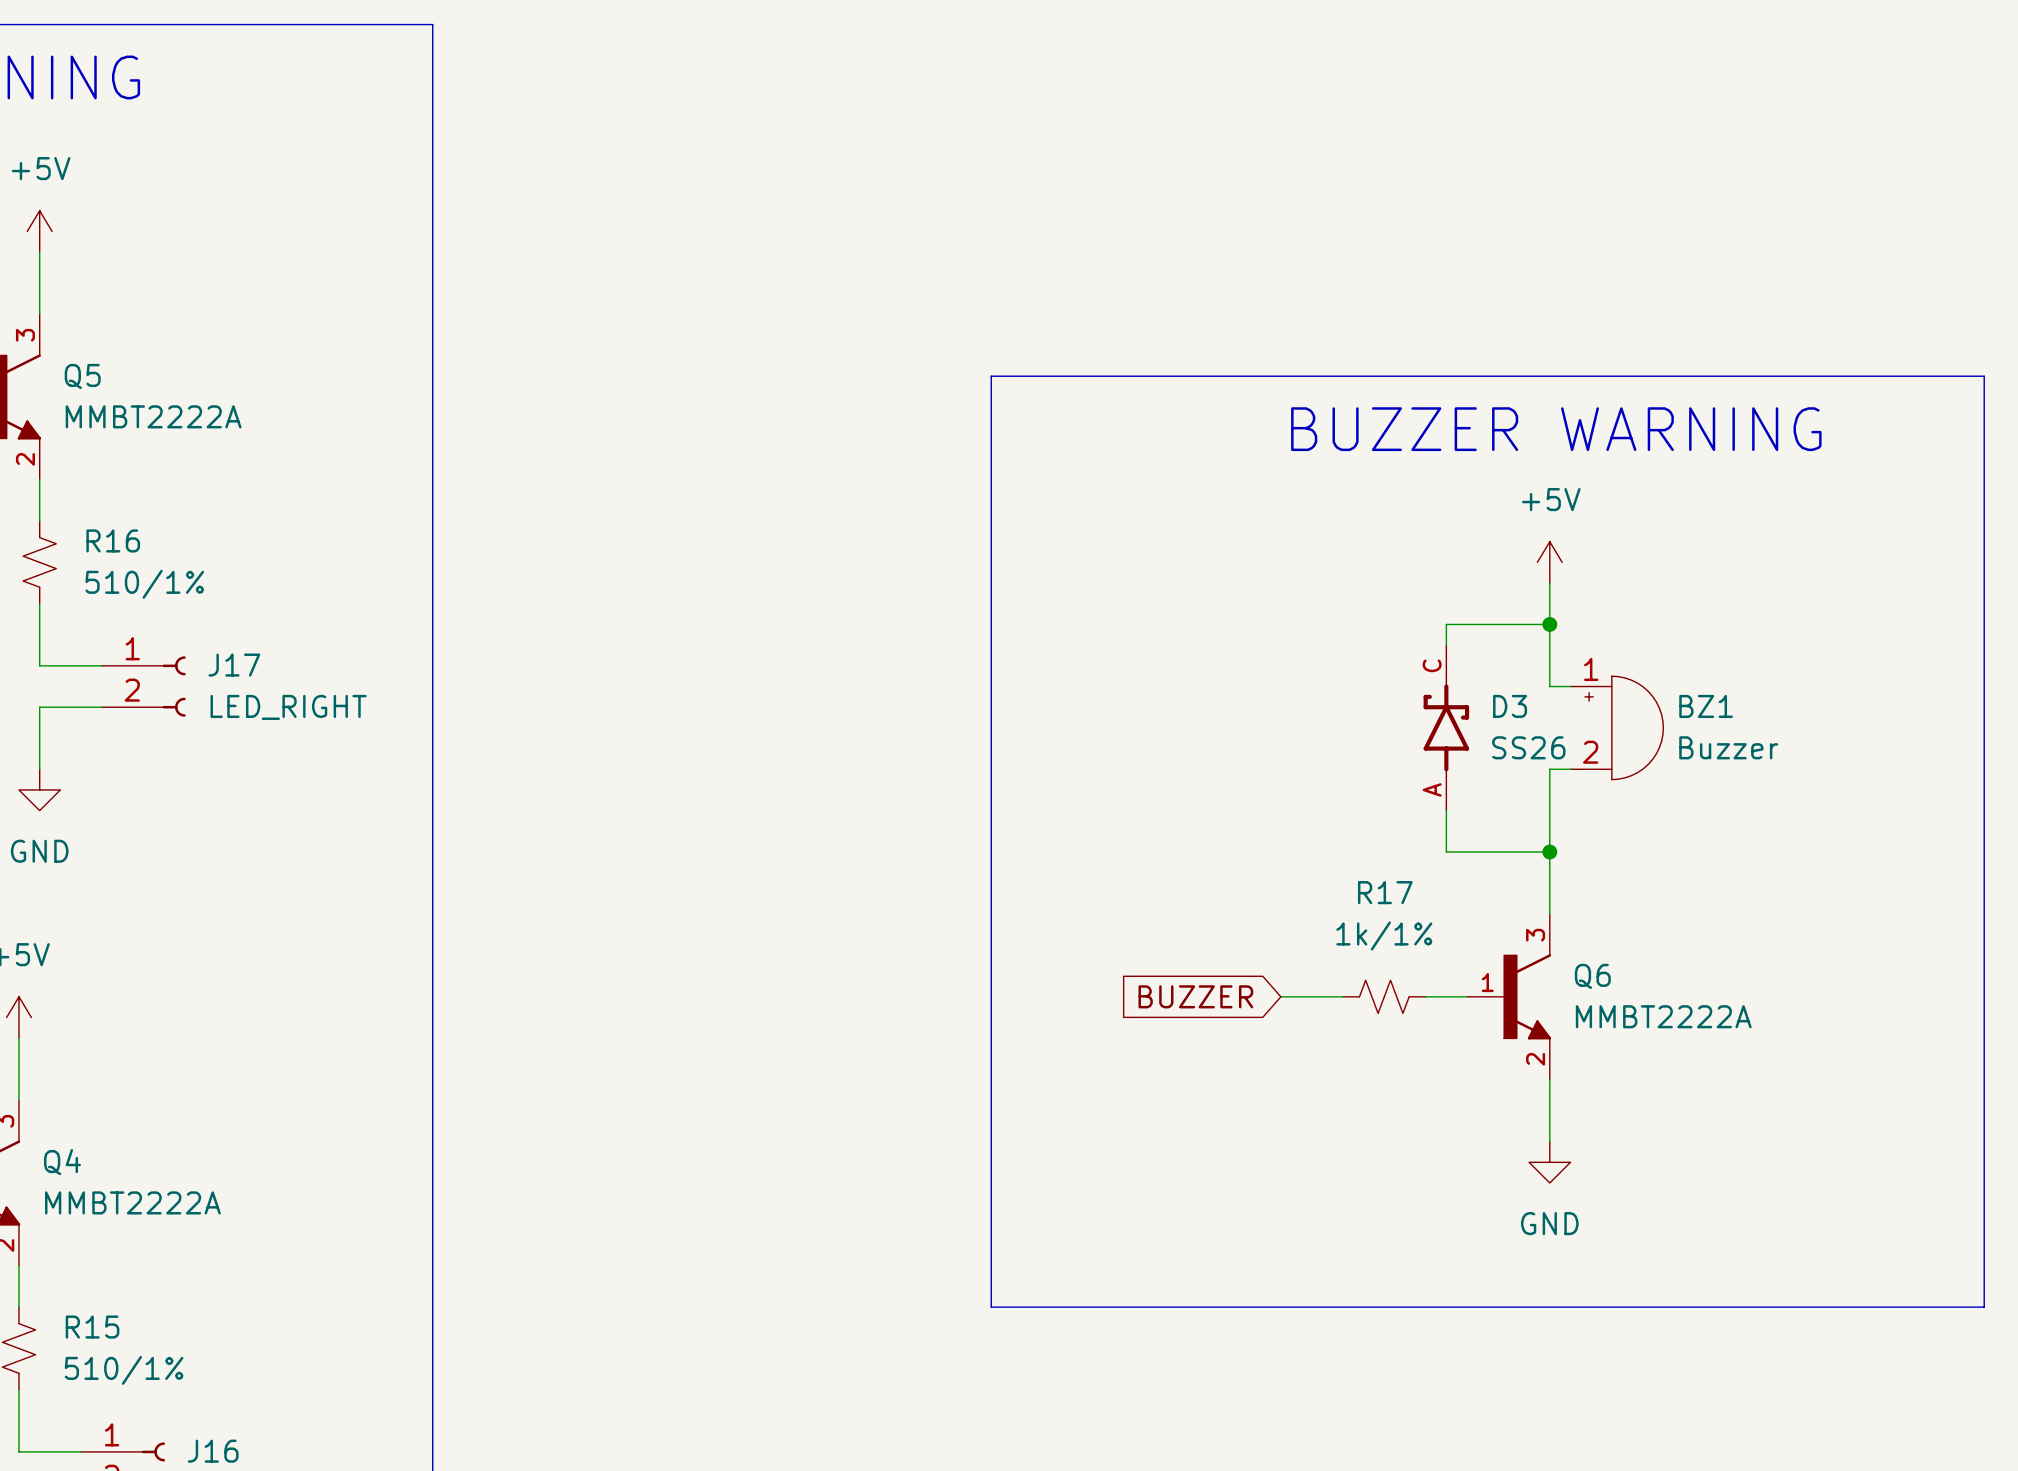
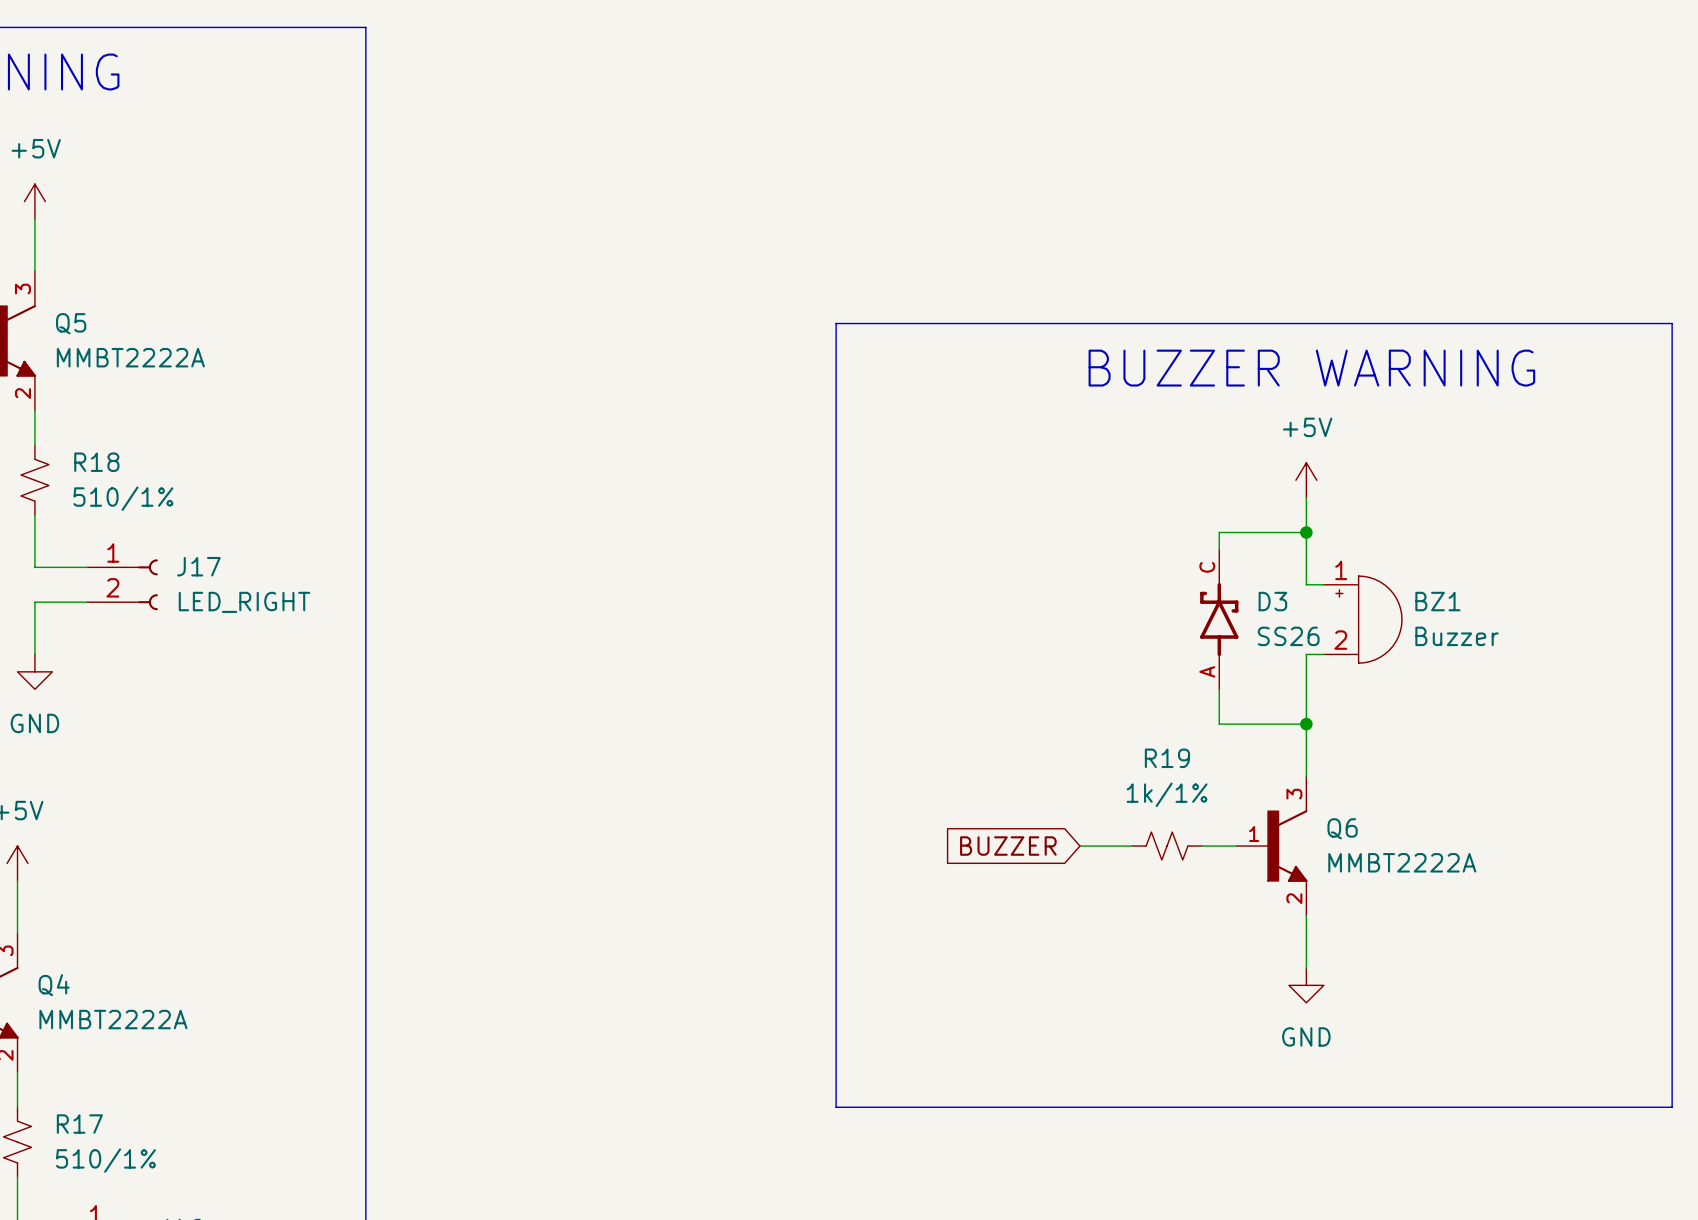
R16 name: R16 (113, 540) -> R18 (96, 462)
R17 name: R17 (1385, 892) -> R19 (1167, 758)
R15 name: R15 (92, 1327) -> R17 (79, 1124)

